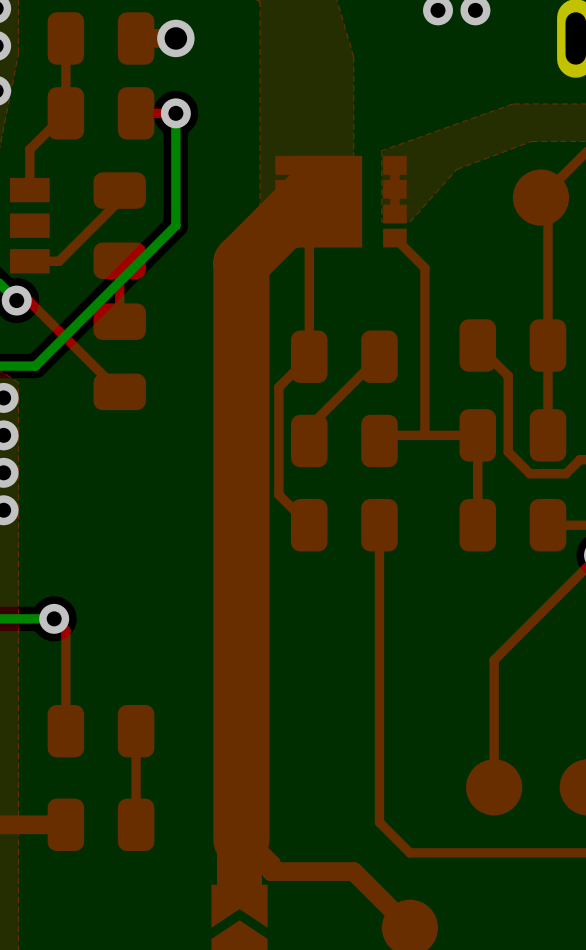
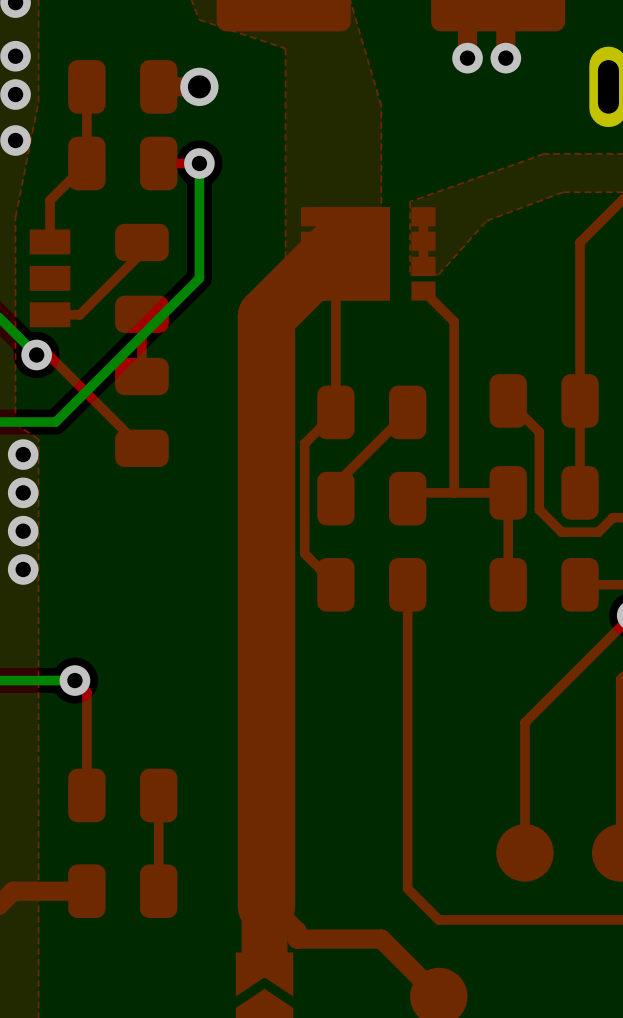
part: (540, 197) -> none

